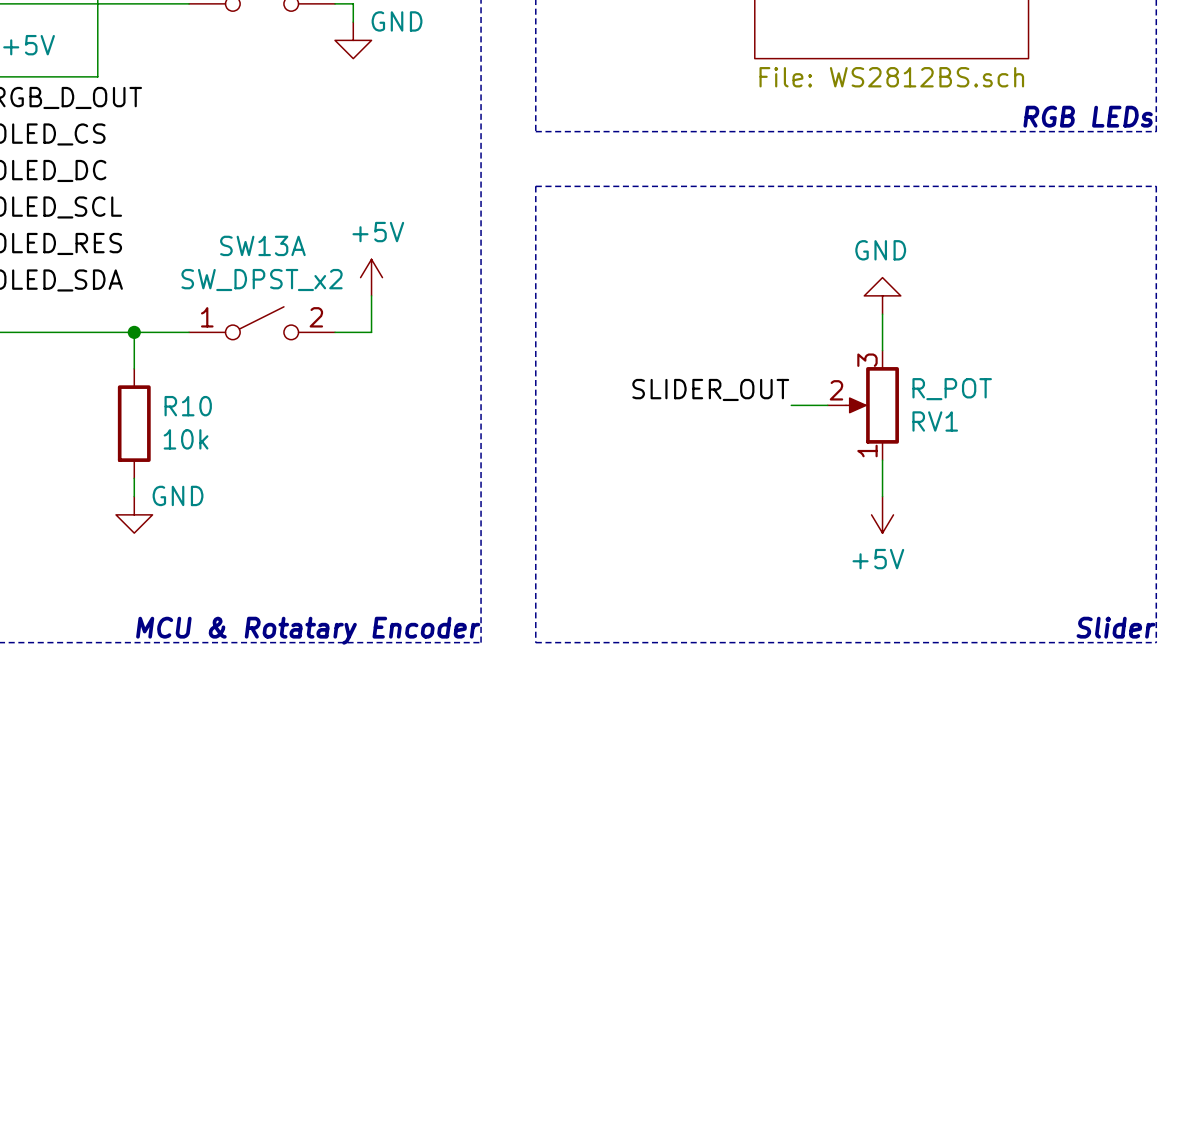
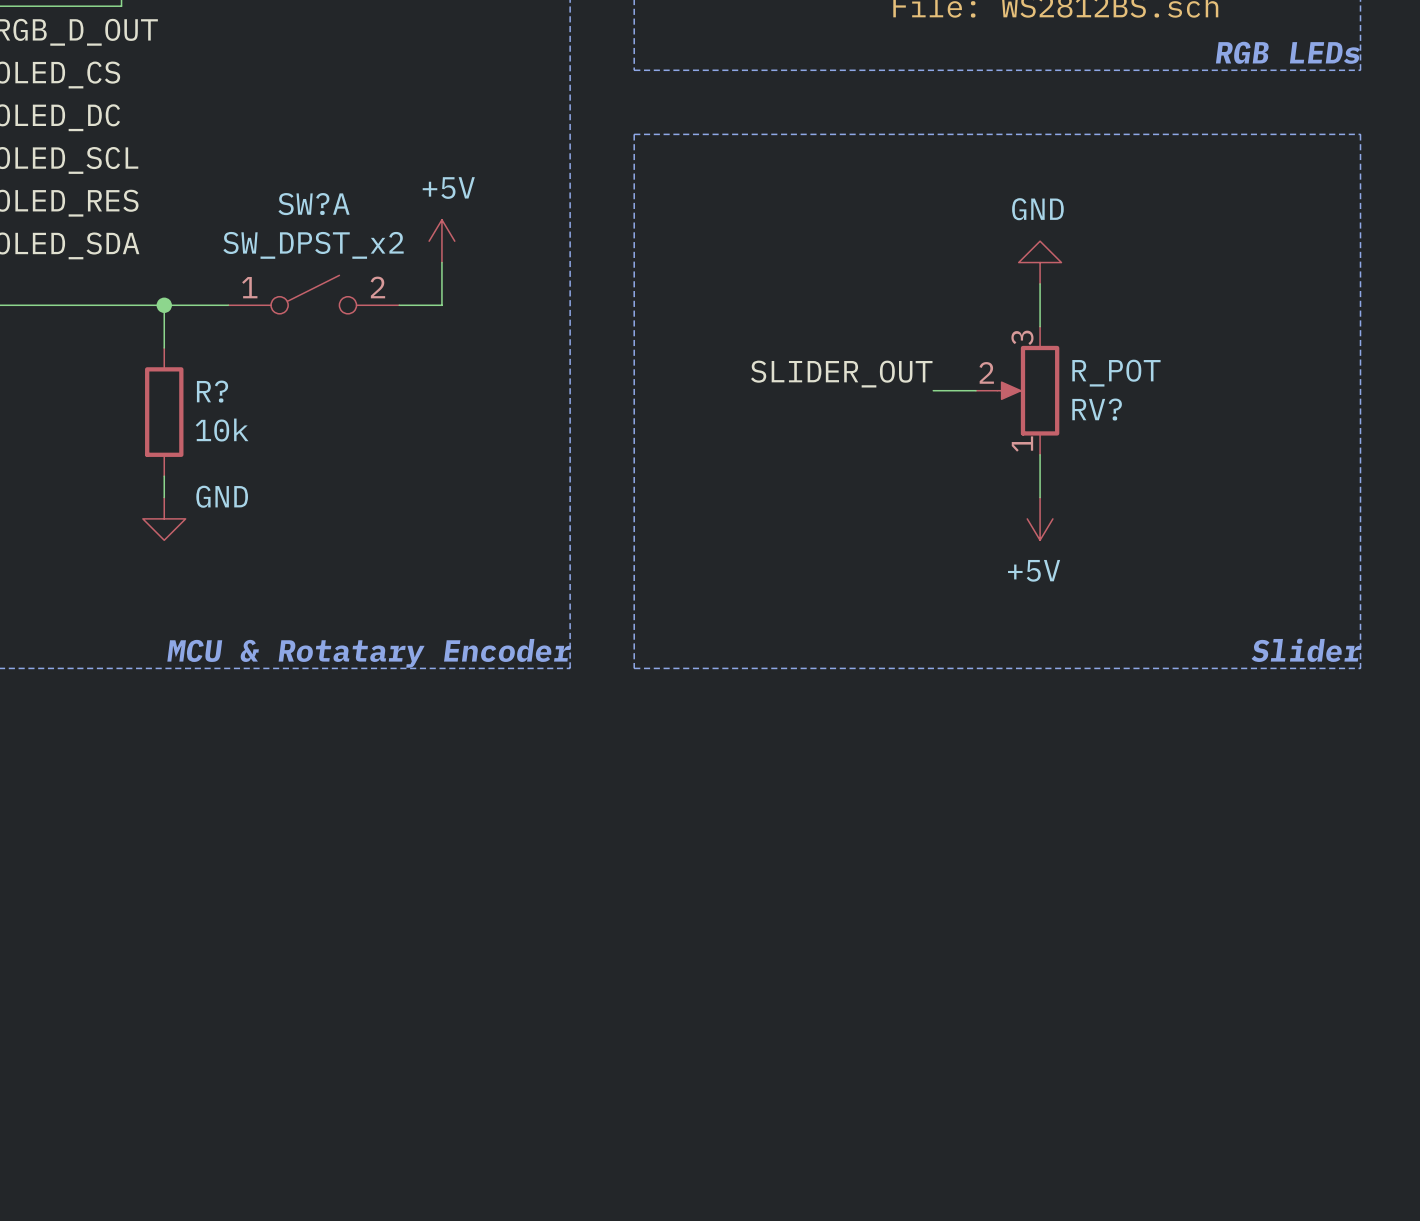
SW13A name: SW13A (262, 245) -> SW?A (314, 204)
R10 name: R10 (188, 406) -> R? (212, 391)
RV1 name: RV1 (935, 421) -> RV? (1097, 409)

